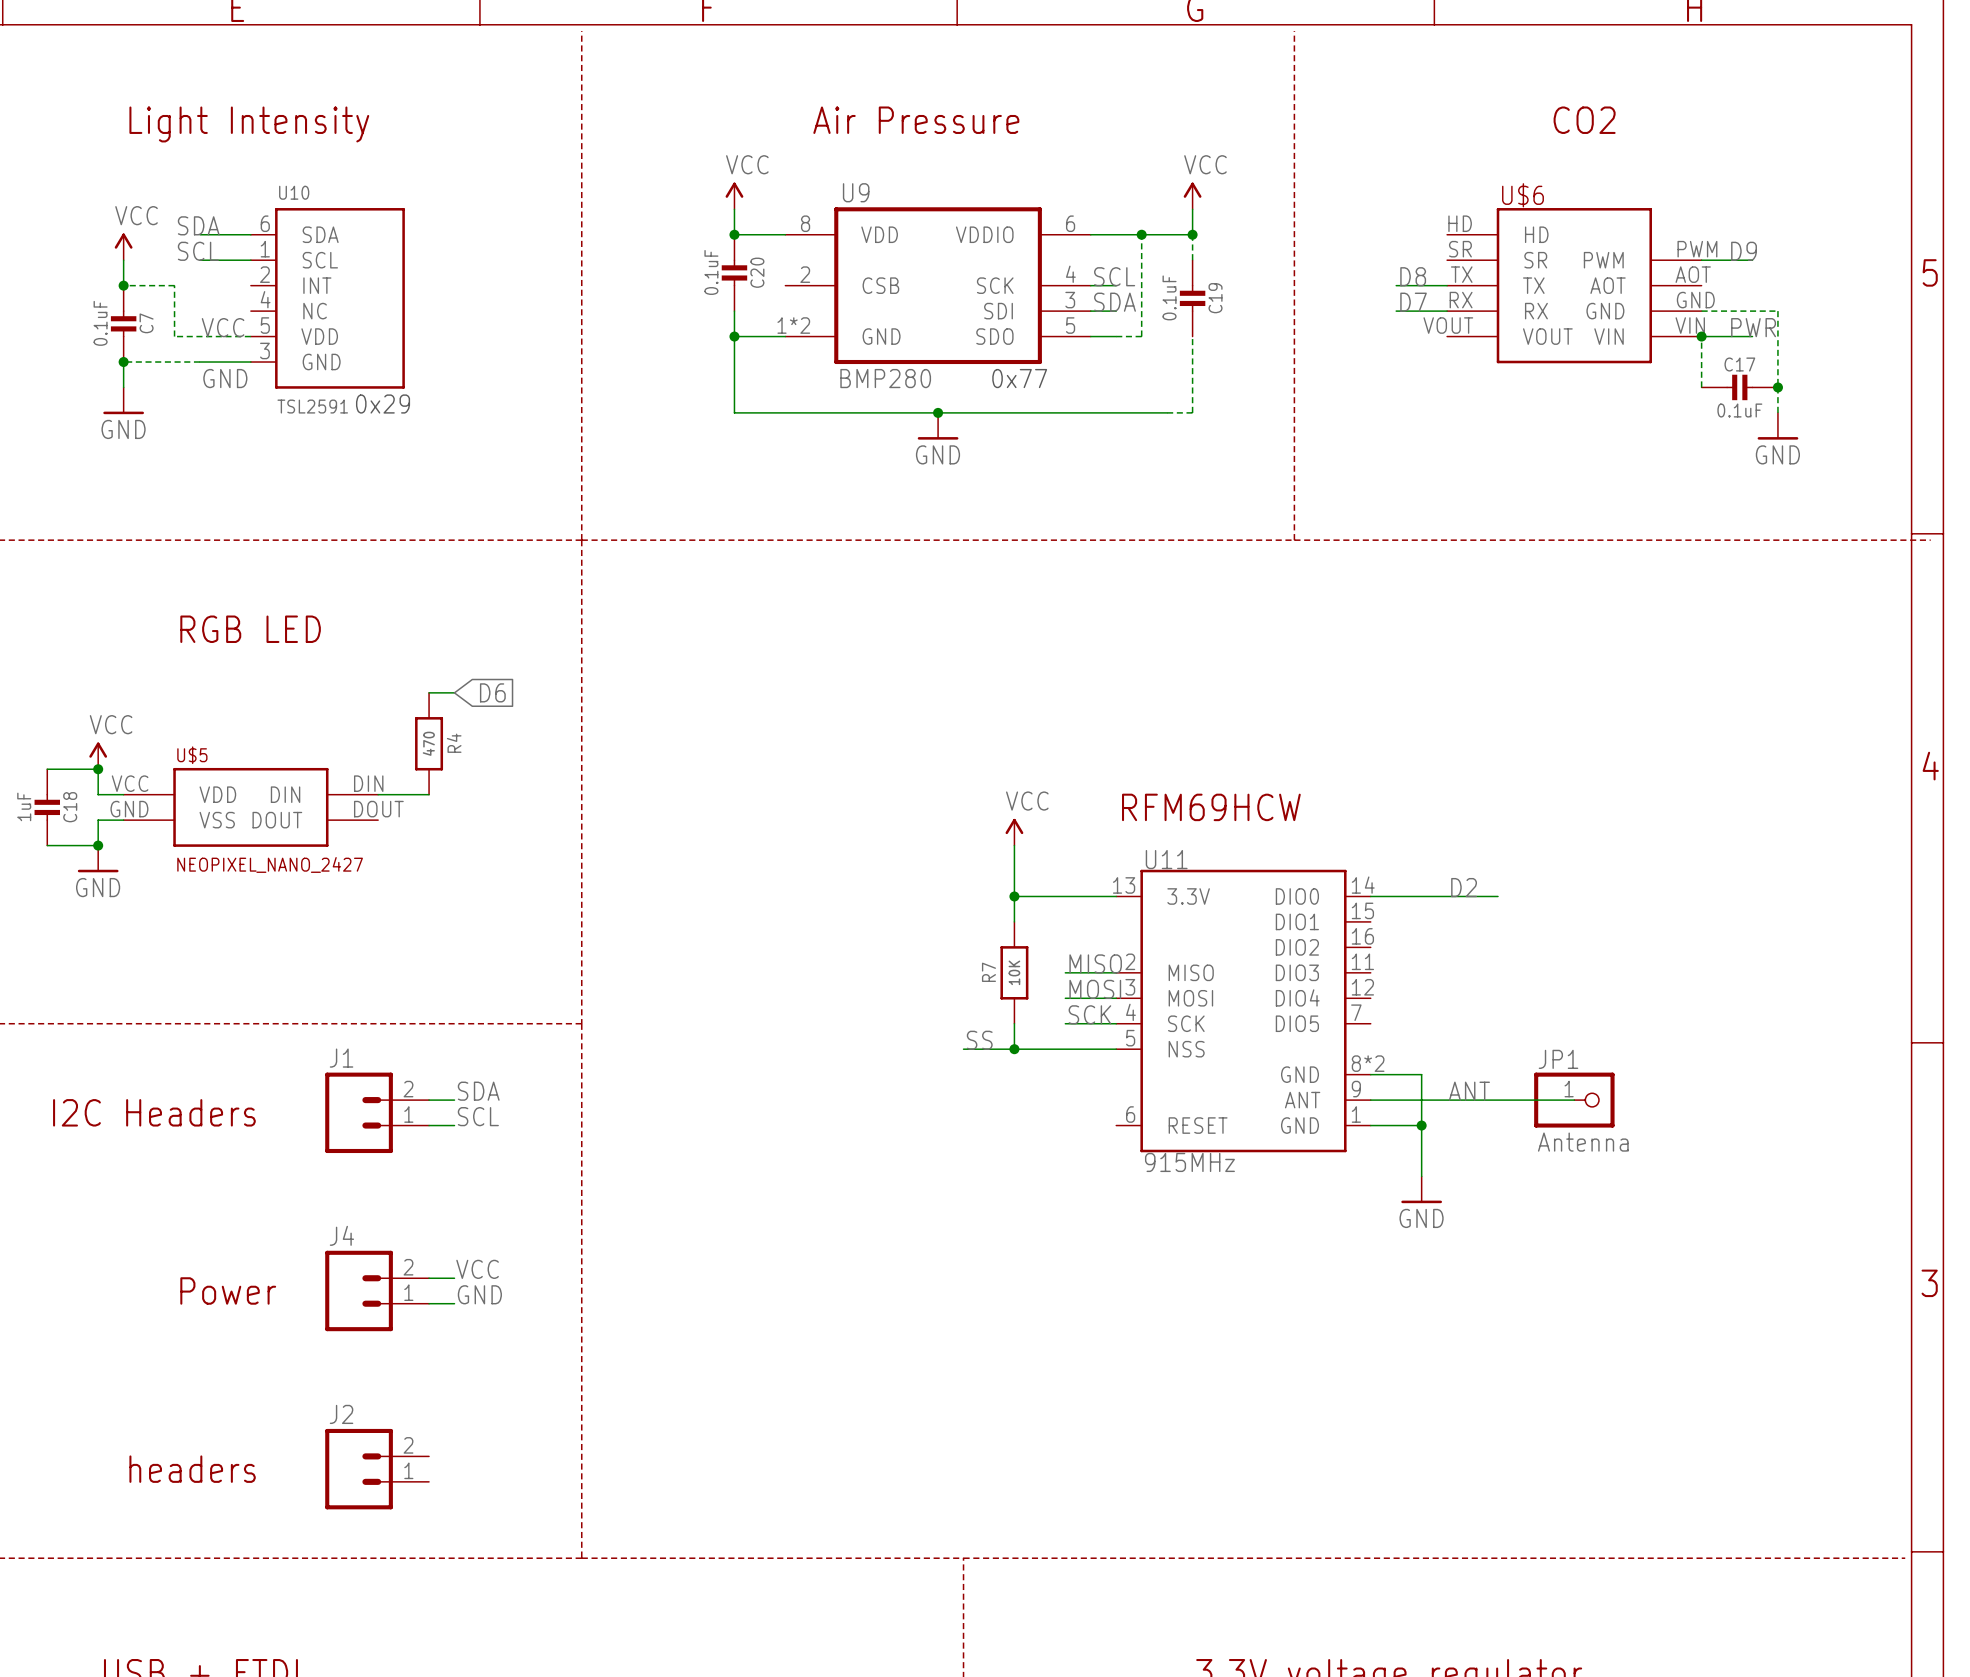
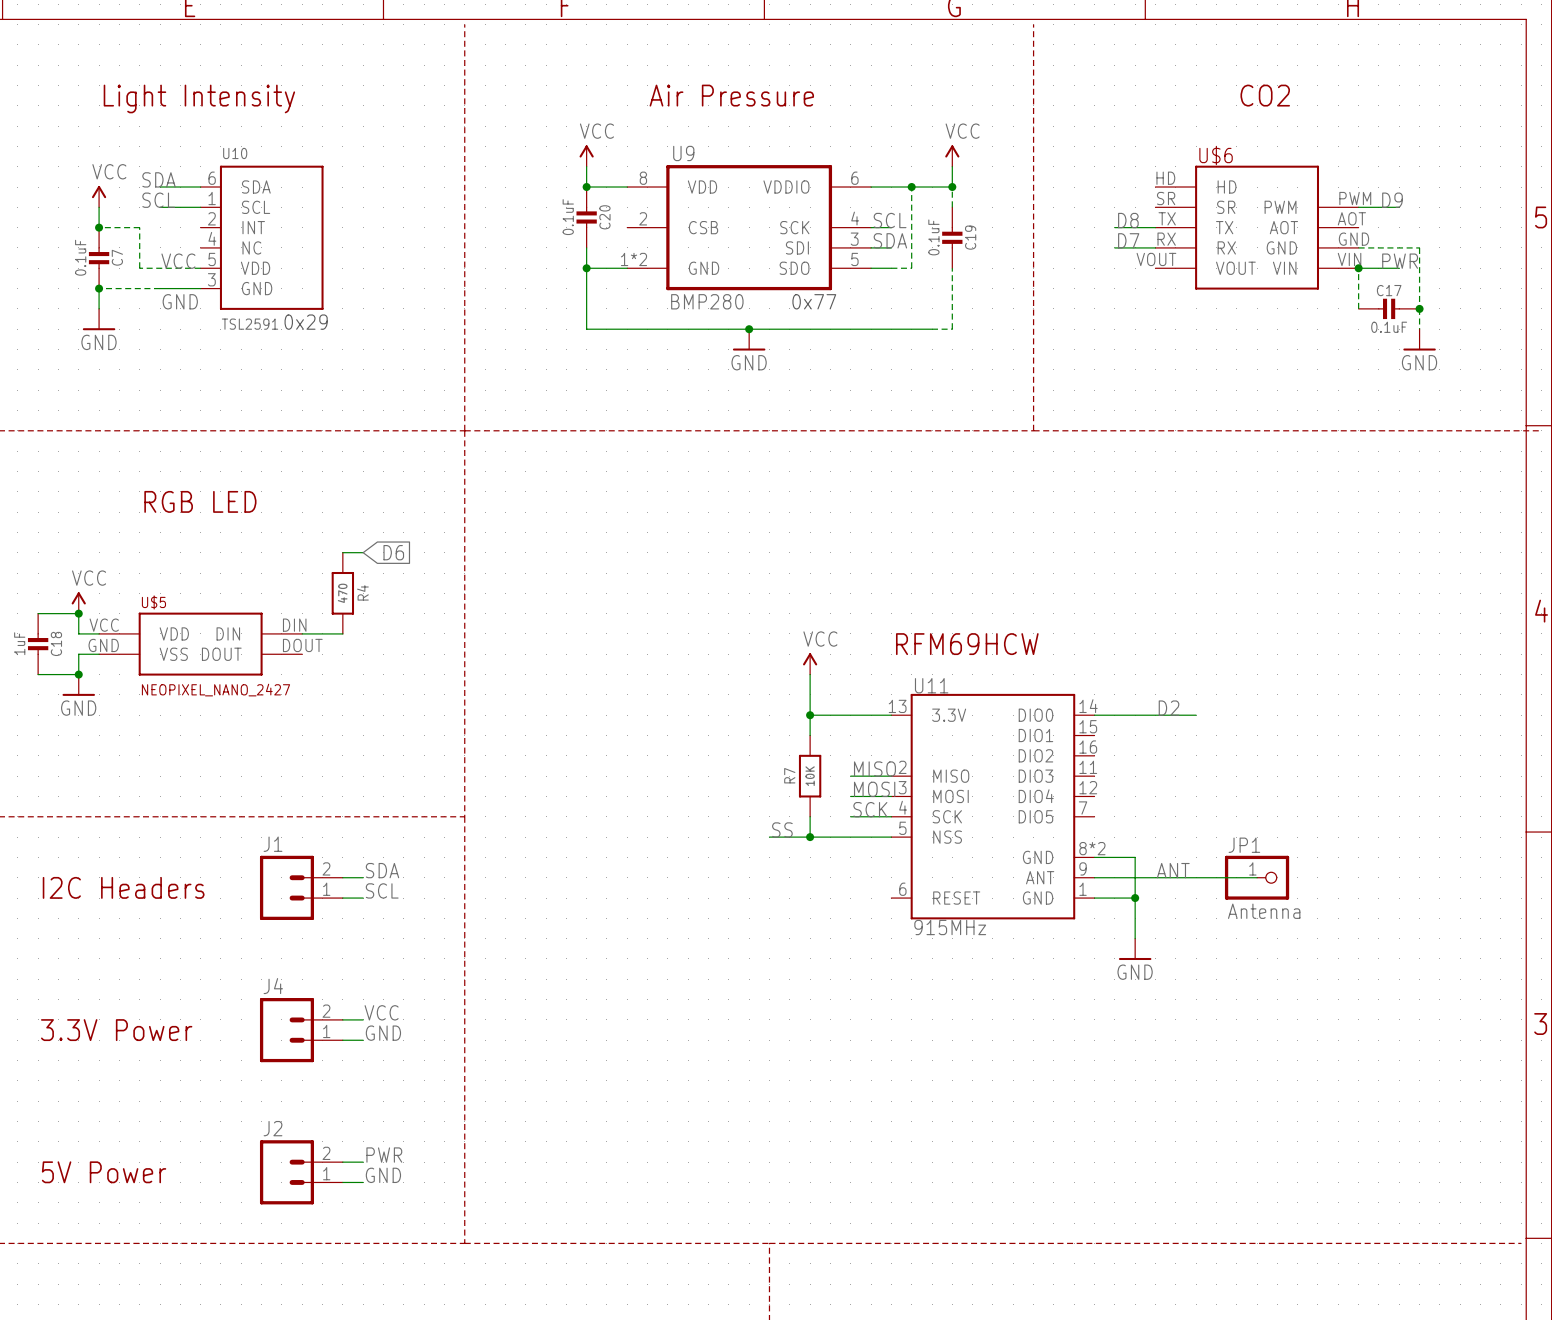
text: Power (228, 1290) -> 3.3V Power (116, 1030)
label: none -> PWR (384, 1155)
wire: none -> (342, 1162) (363, 1162)
text: none -> 5V Power (104, 1172)
text: headers (192, 1469) -> none
label: none -> GND (383, 1175)
wire: none -> (342, 1182) (363, 1182)

